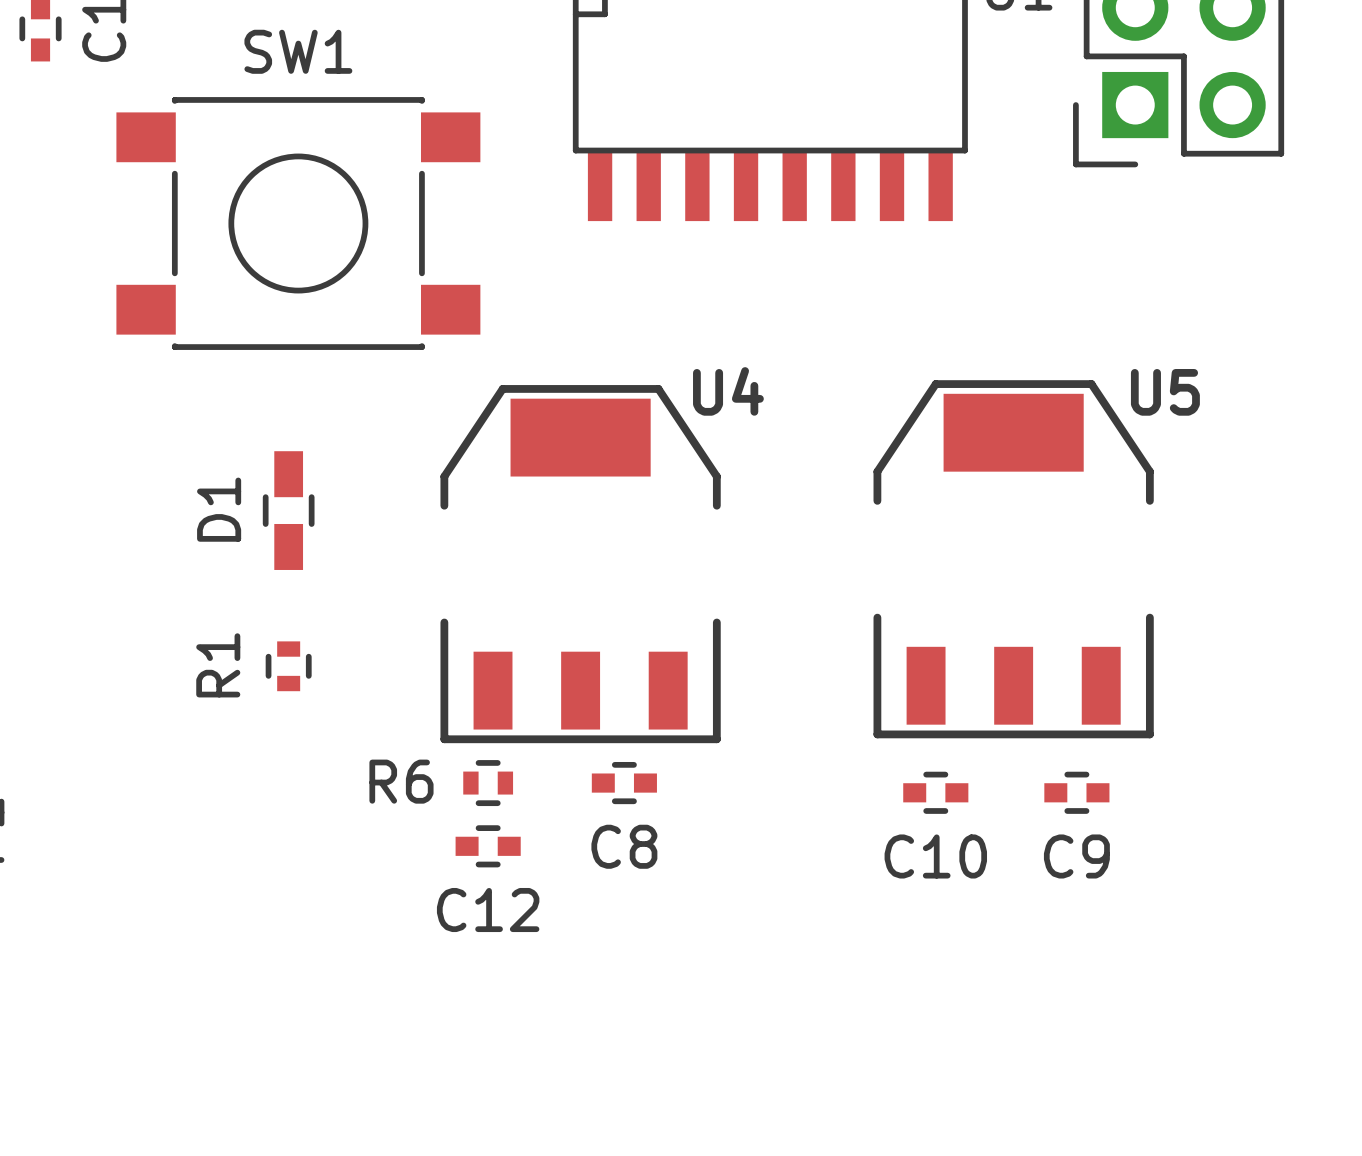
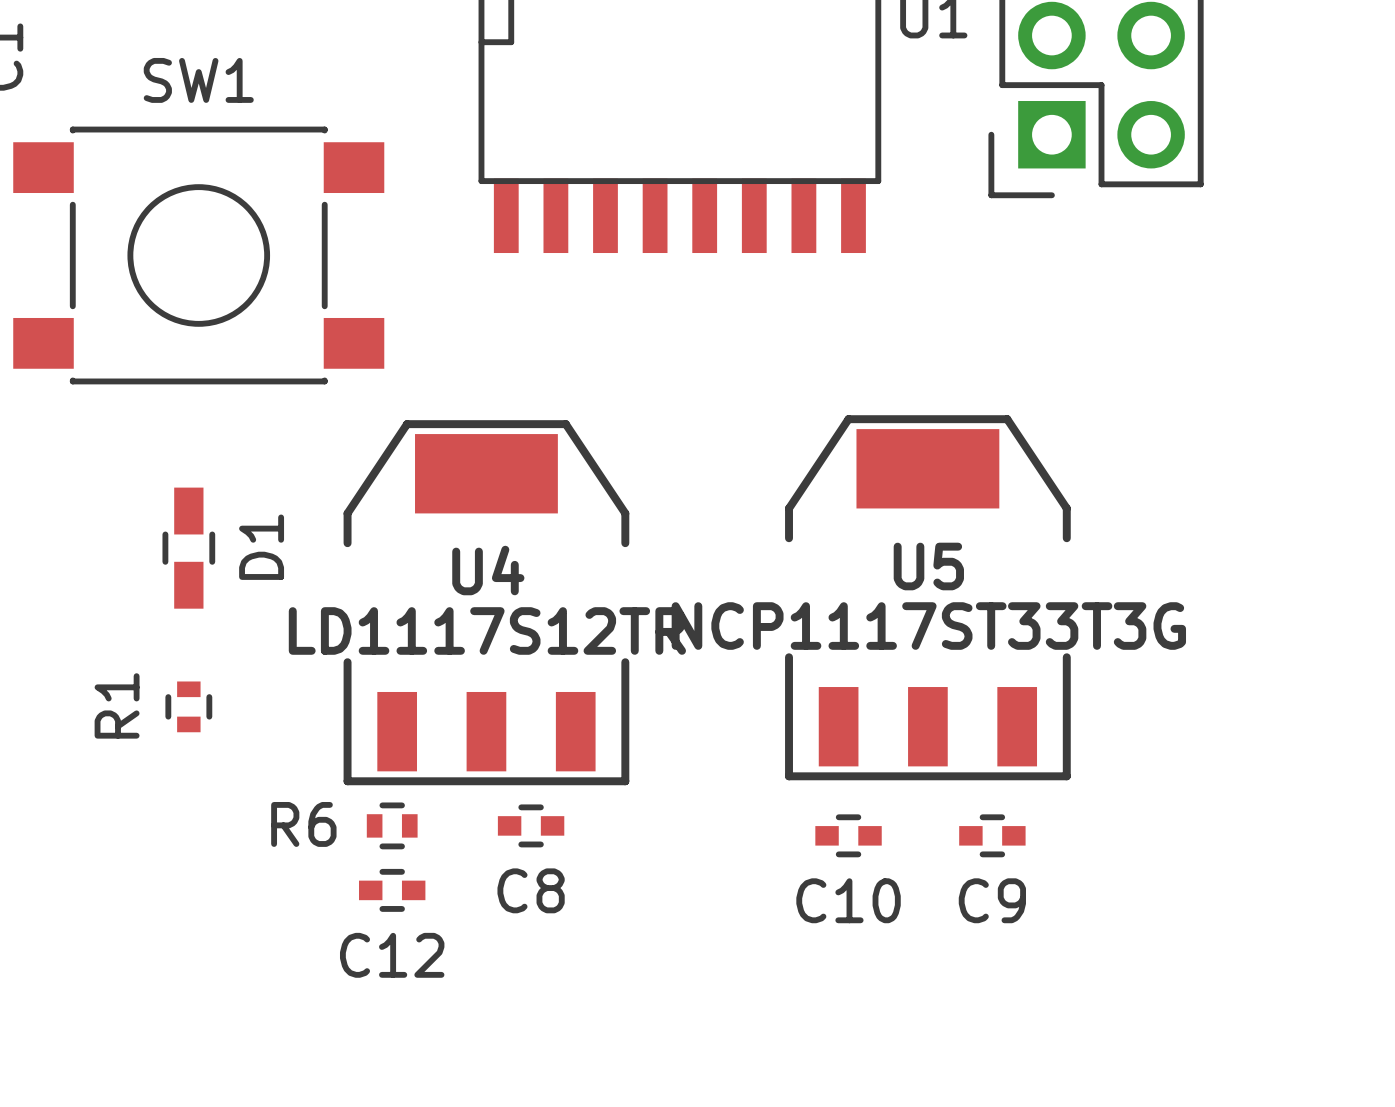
U4 name position: U4 (728, 391) -> U4 (488, 570)
U5 name position: U5 (1165, 392) -> U5 (928, 566)
D1 name position: D1 (219, 509) -> D1 (261, 547)
U5 value: none -> NCP1117ST33T3G (928, 626)
U4 value: none -> LD1117S12TR (487, 630)

